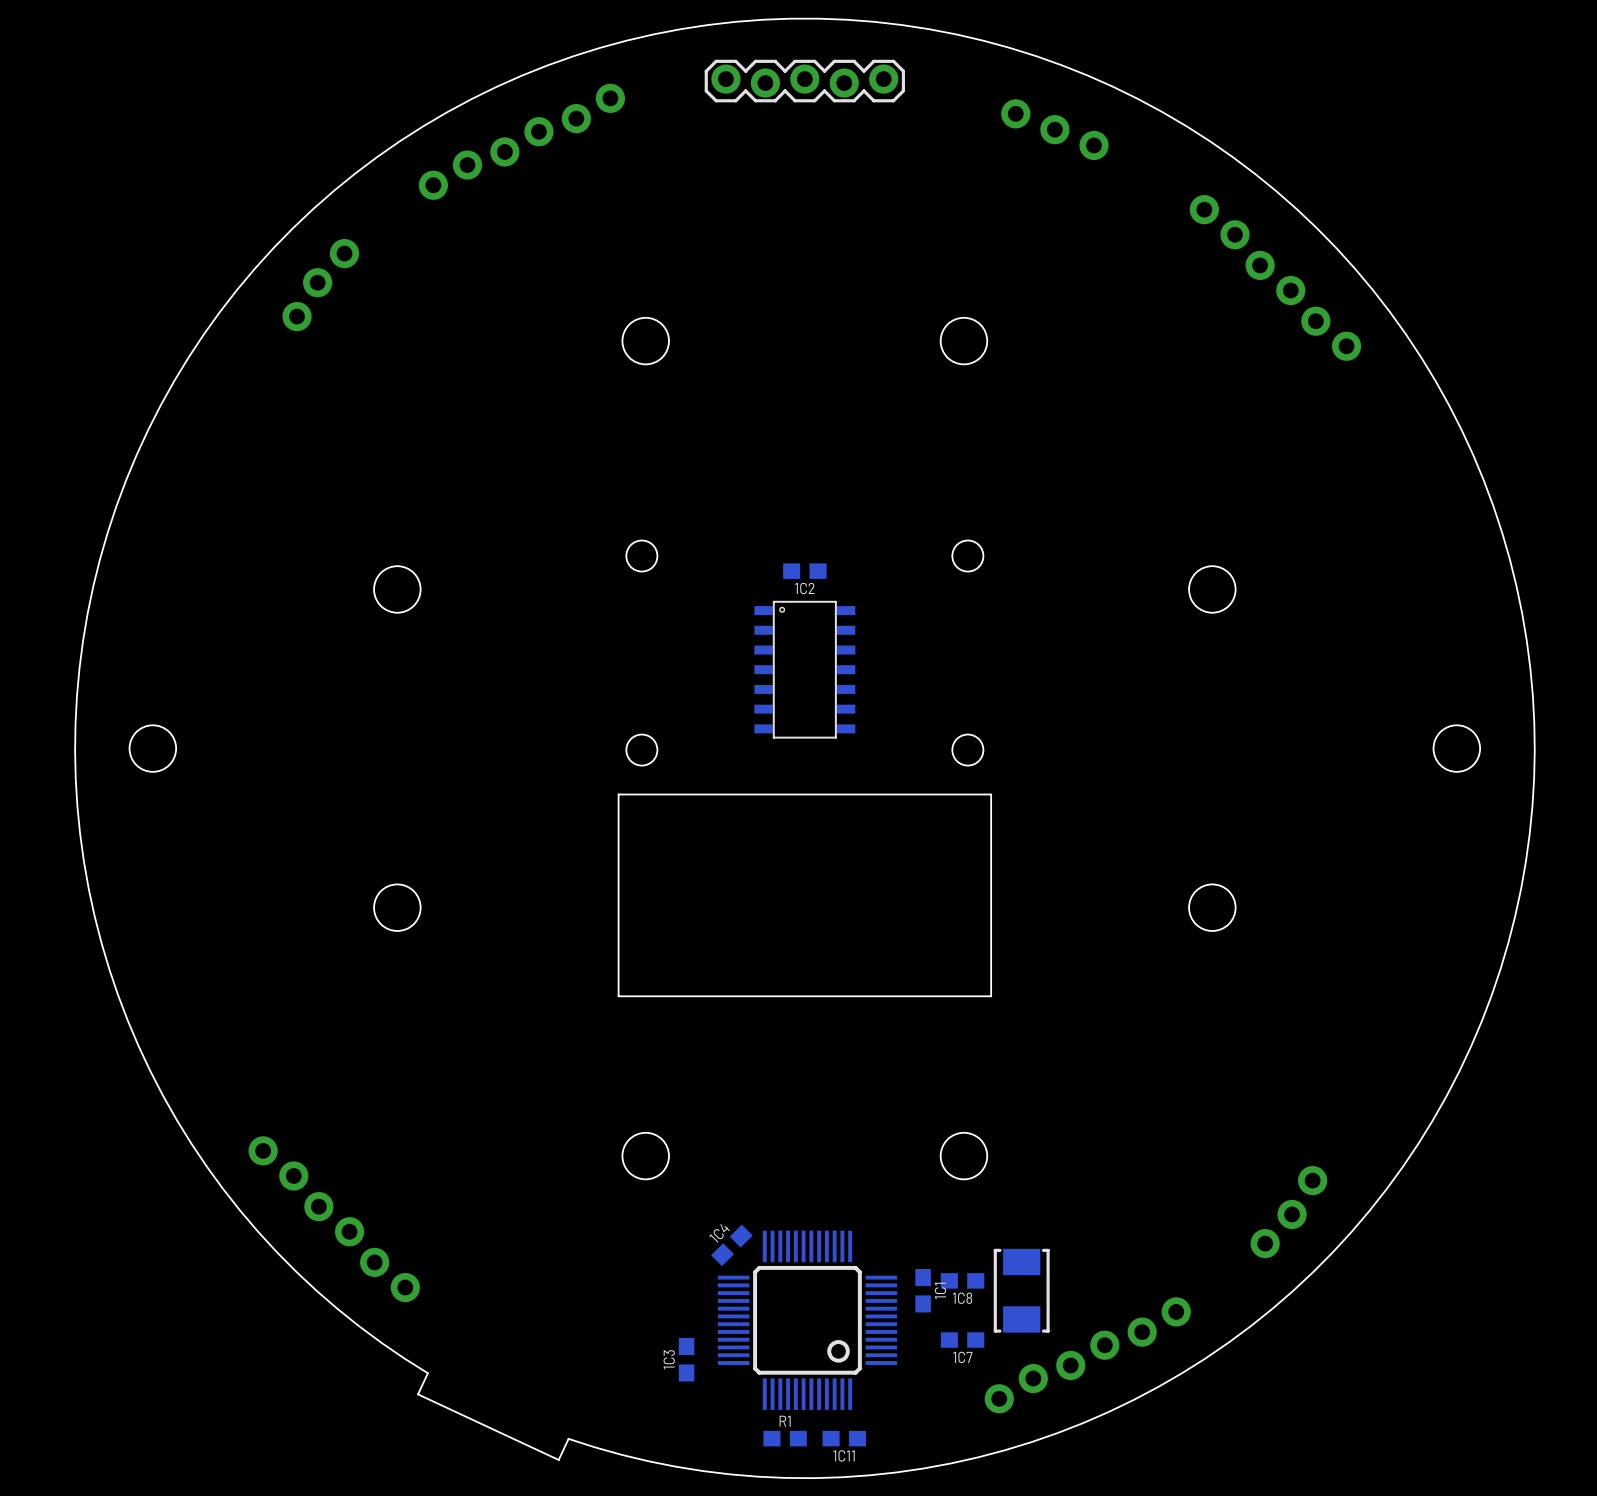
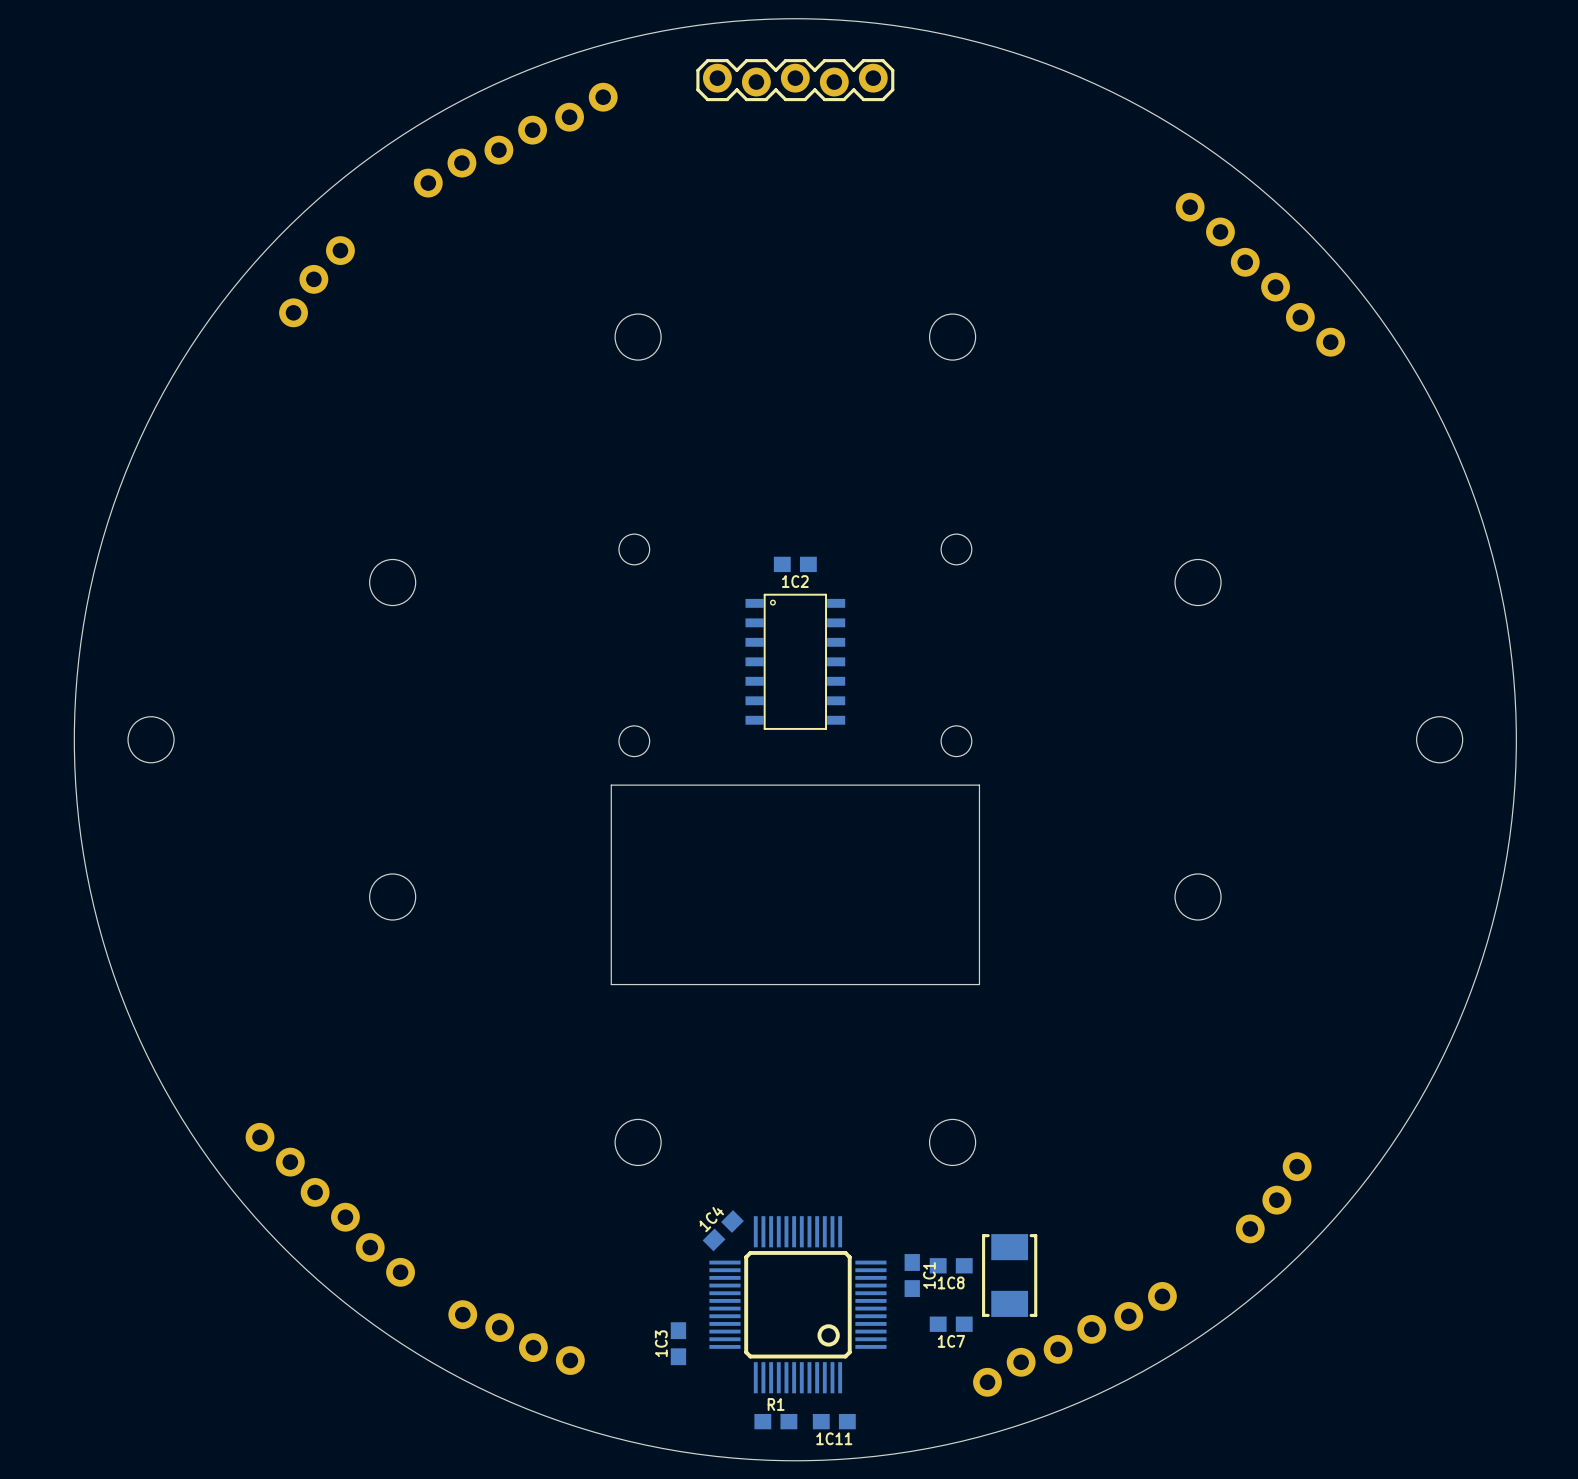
round board edge: none -> [74, 18, 1517, 1461]
part: (1054, 129) -> none
part: none -> (516, 1337)
board edge: (427, 1373) (418, 1394) (558, 1459) (568, 1438) (621, 1454) (675, 1466) (758, 1476) (813, 1478) (868, 1475) (923, 1468) (977, 1457) (1057, 1433) (1108, 1412) (1181, 1373) (1250, 1326) (1292, 1291) (1351, 1232) (1386, 1189) (1432, 1120) (1459, 1071) (1491, 995) (1508, 942) (1525, 861) (1532, 806) (1534, 723) (1526, 640) (1509, 559) (1483, 480) (1461, 429) (1421, 357) (1389, 311) (1336, 248) (1296, 209) (1232, 156) (1186, 126) (1113, 86) (1062, 65) (983, 40) (901, 24) (818, 18) (763, 19) (680, 29) (626, 40) (573, 56) (496, 86) (447, 112) (377, 156) (312, 209) (254, 268) (203, 334) (174, 380) (148, 429) (116, 506) (93, 586) (83, 640) (77, 695) (75, 778) (80, 833) (94, 915) (118, 995) (138, 1046) (176, 1120) (223, 1189) (277, 1252) (316, 1290) (359, 1326) (427, 1373) -> none

